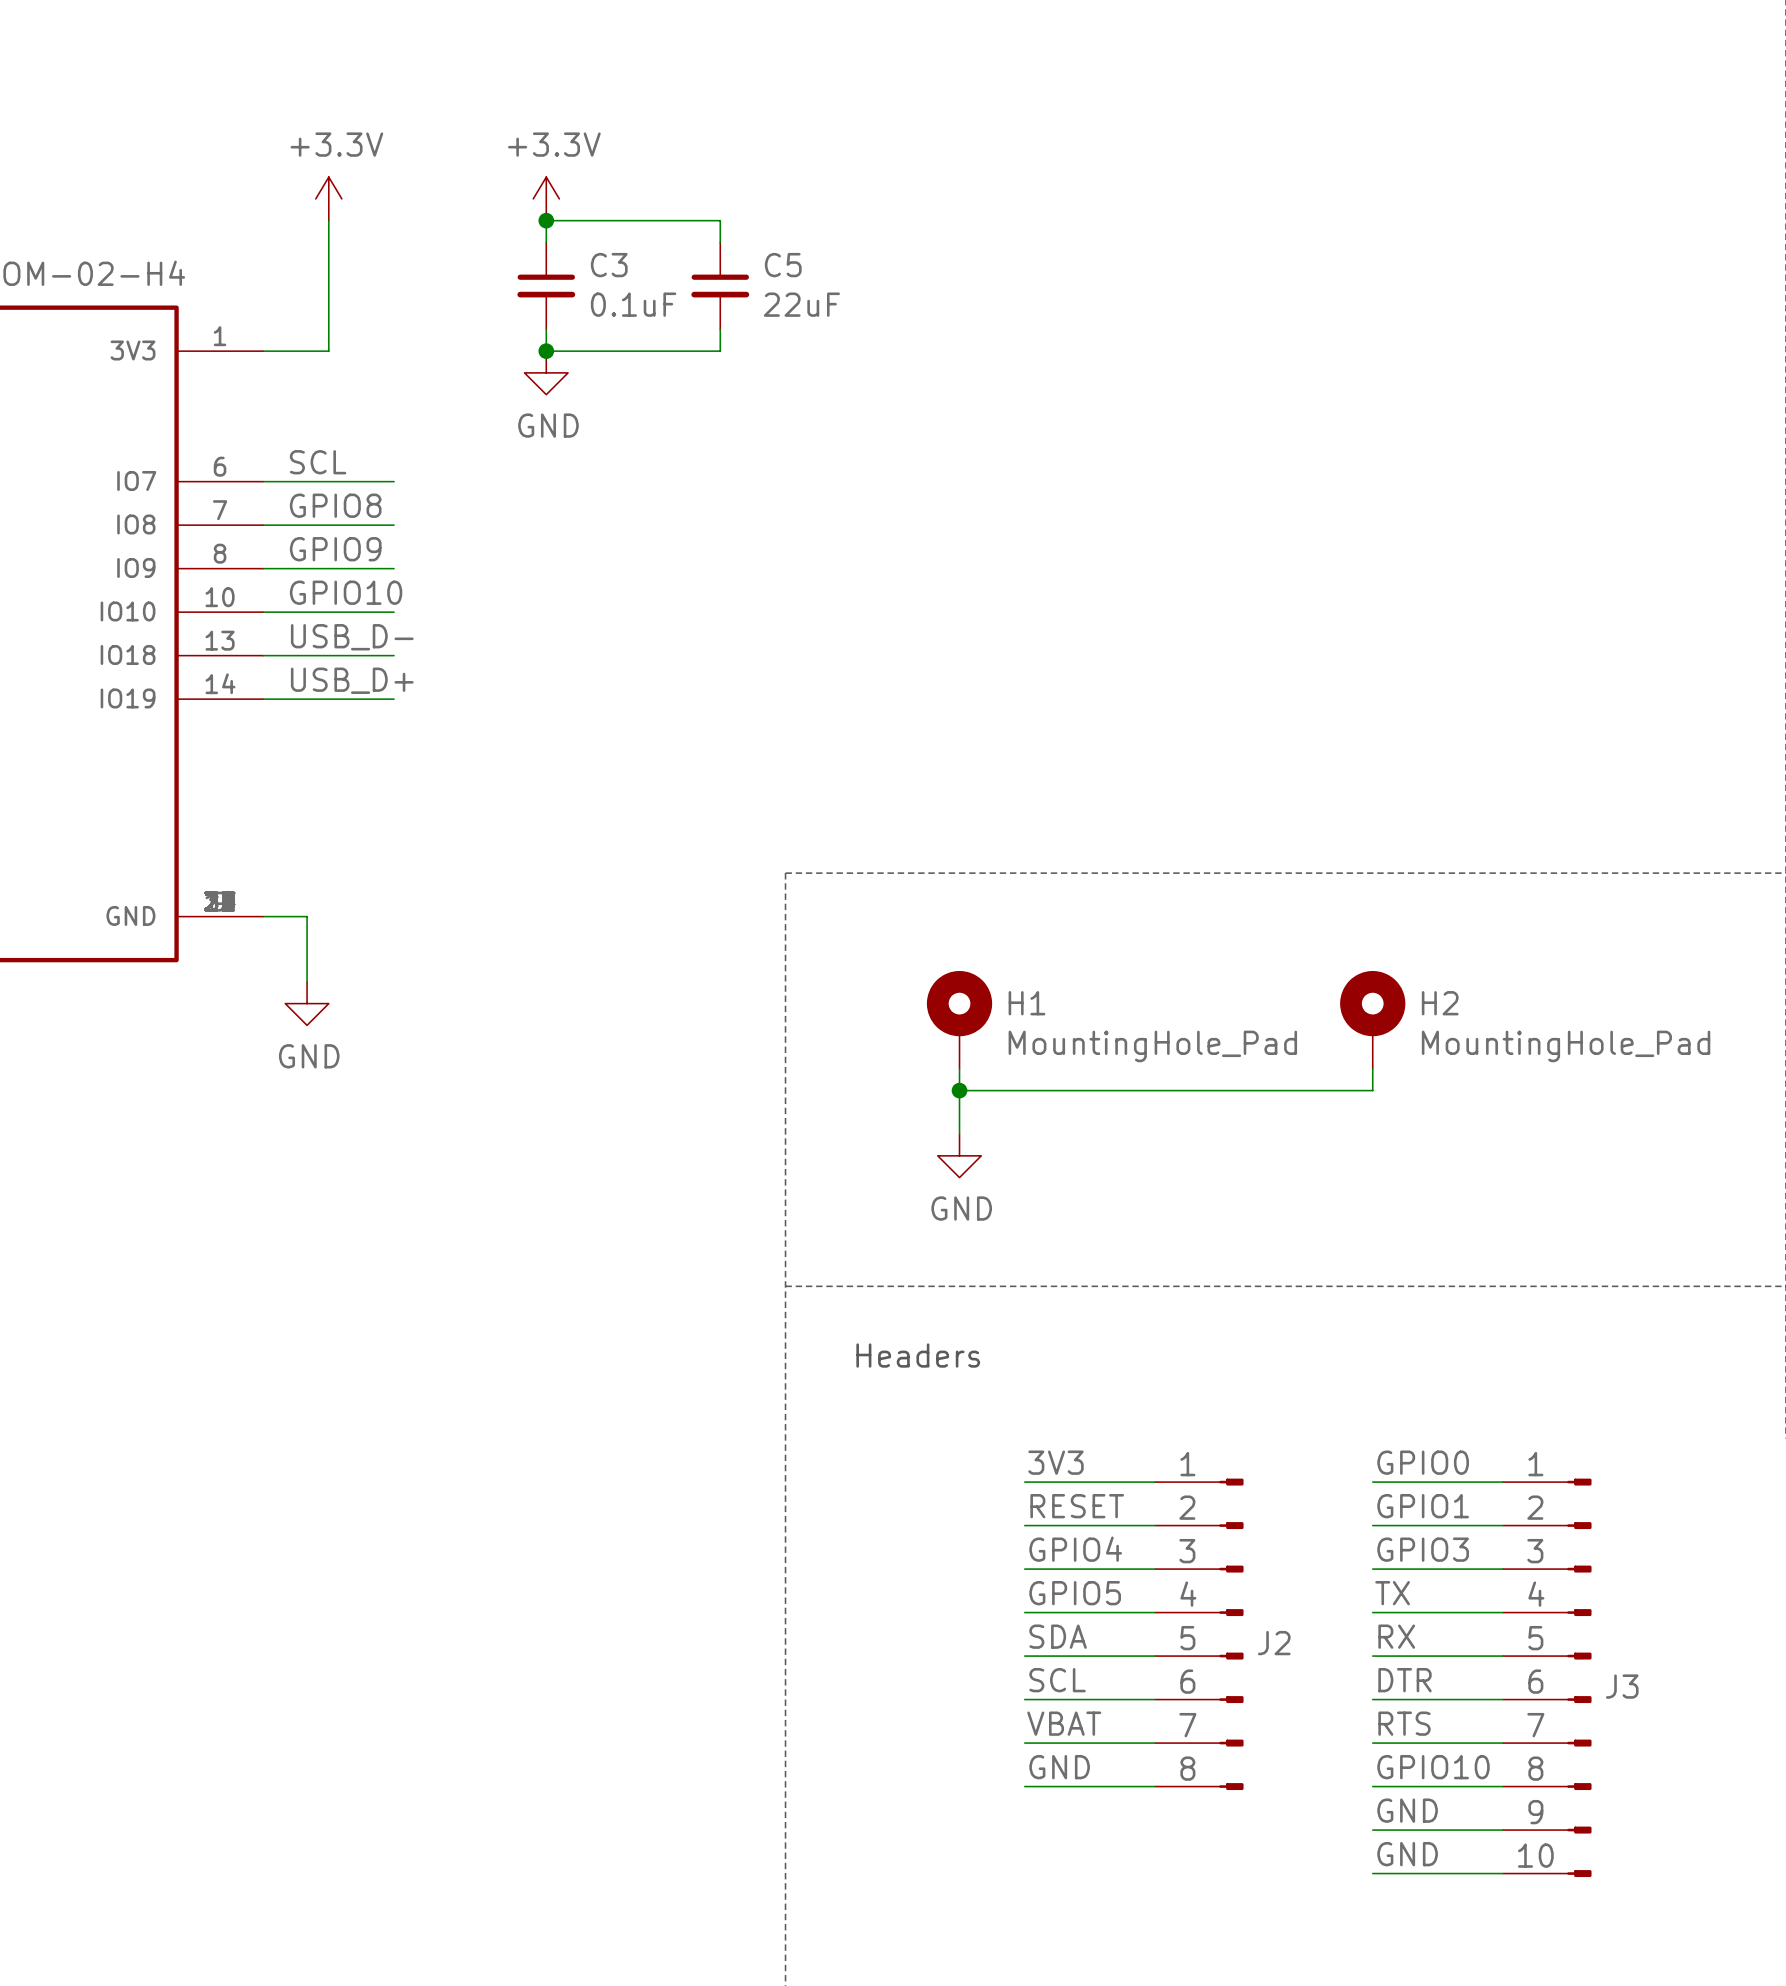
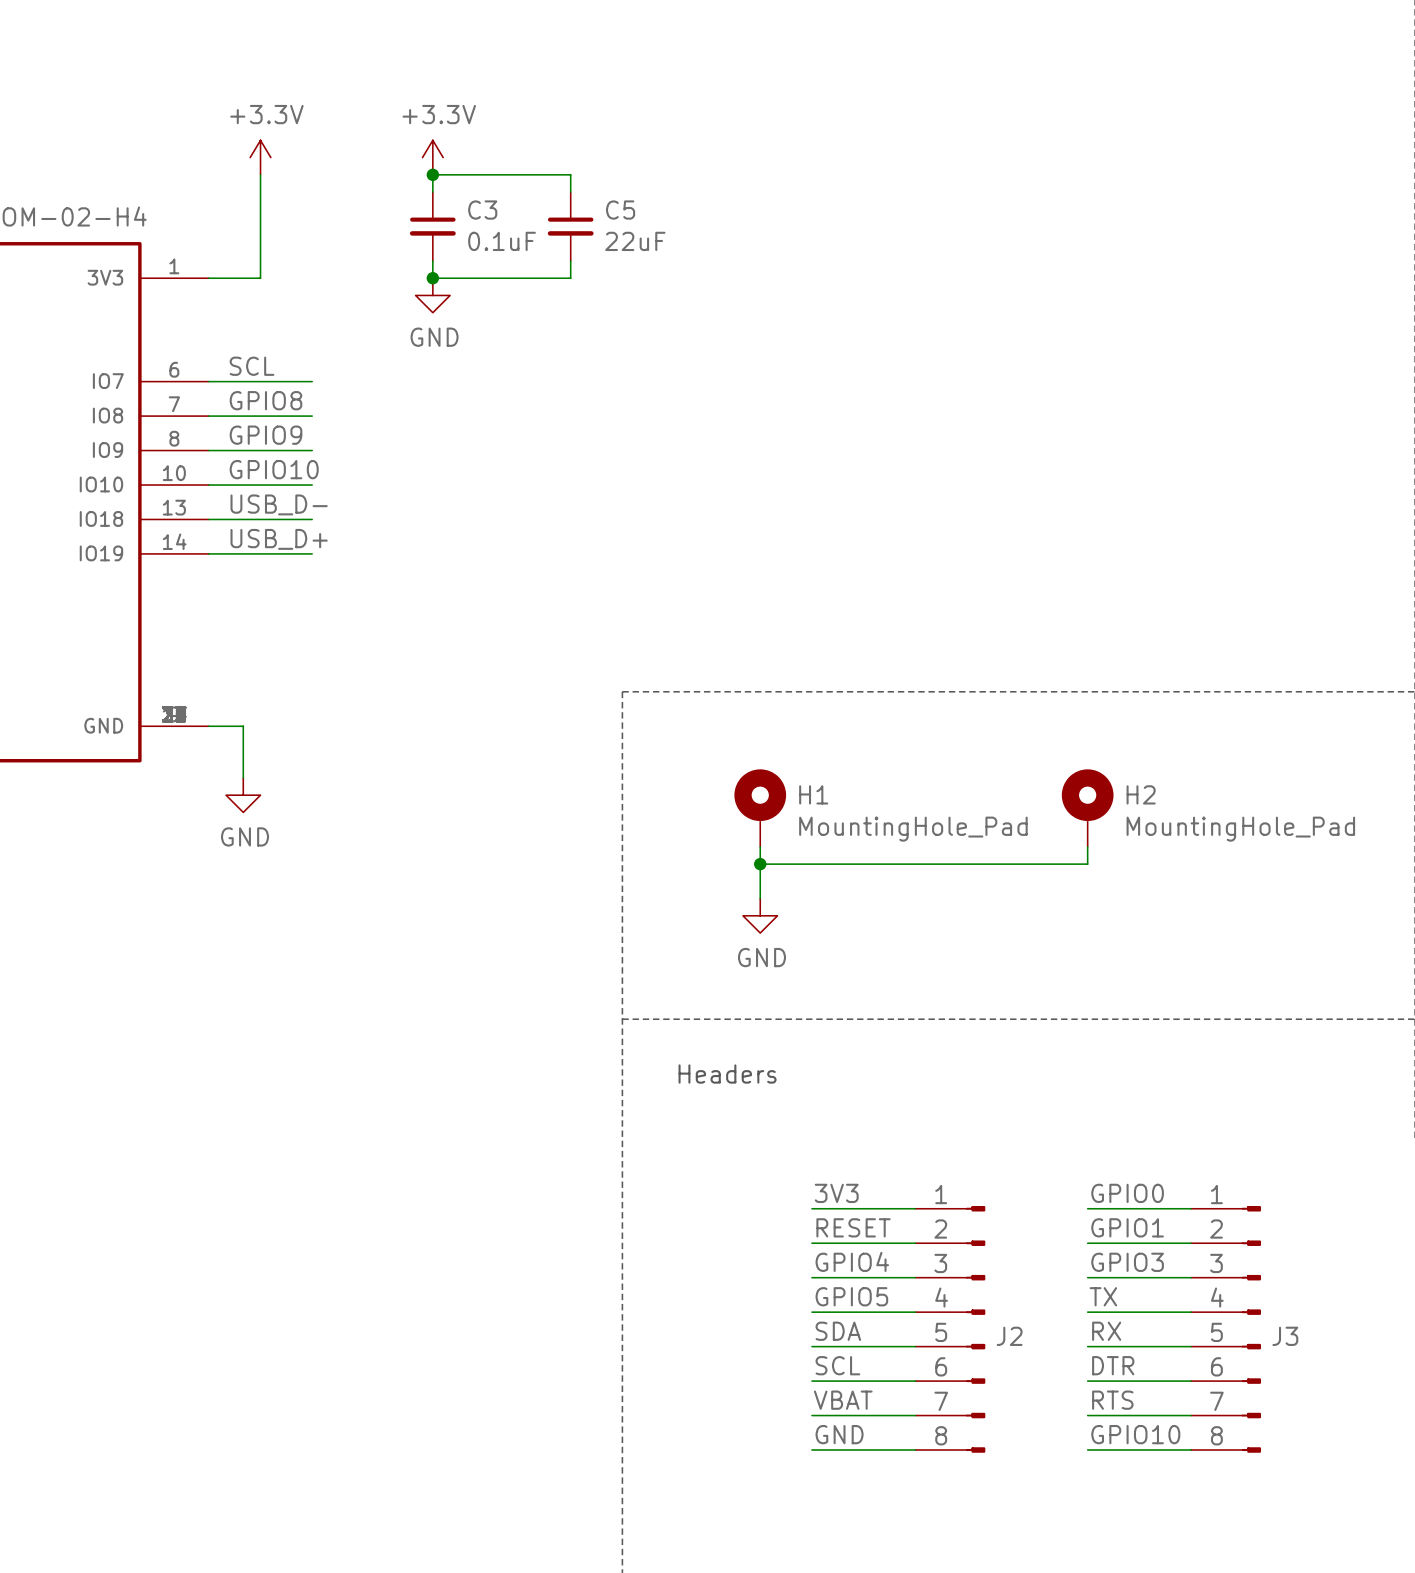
label: 3V3 (1055, 1462) -> none
label: GPIO0 (1423, 1462) -> none
J3 symbol: [1503, 1478, 1592, 1878] -> [1191, 1206, 1262, 1453]
wire: (1024, 1482) (1155, 1482) -> (811, 1450) (915, 1450)
wire: (1372, 1482) (1503, 1482) -> none
label: RESET (1077, 1506) -> 3V3 (836, 1193)
label: GPIO1 (1423, 1506) -> GPIO0 (1127, 1193)
label: GPIO4 (1075, 1549) -> RESET (853, 1227)
label: GPIO3 (1423, 1549) -> GPIO1 (1127, 1227)
label: GPIO5 (1075, 1593) -> GPIO4 (852, 1261)
label: TX (1392, 1593) -> GPIO3 (1127, 1262)
J2 position: (1199, 1634) -> (950, 1329)
label: SDA (1058, 1636) -> GPIO5 (851, 1296)
label: RX (1396, 1636) -> TX (1103, 1296)
label: SCL (1057, 1680) -> SDA (838, 1331)
label: DTR (1405, 1680) -> RX (1106, 1331)
label: VBAT (1064, 1723) -> SCL (837, 1365)
label: RTS (1404, 1723) -> DTR (1113, 1365)
label: GND (1059, 1767) -> VBAT (843, 1400)
label: GPIO10 (1433, 1767) -> RTS (1112, 1400)
label: GND (1407, 1810) -> GPIO10 (1135, 1434)
label position: GND (1407, 1854) -> GND (839, 1434)
wire: (1372, 1873) (1503, 1873) -> none

